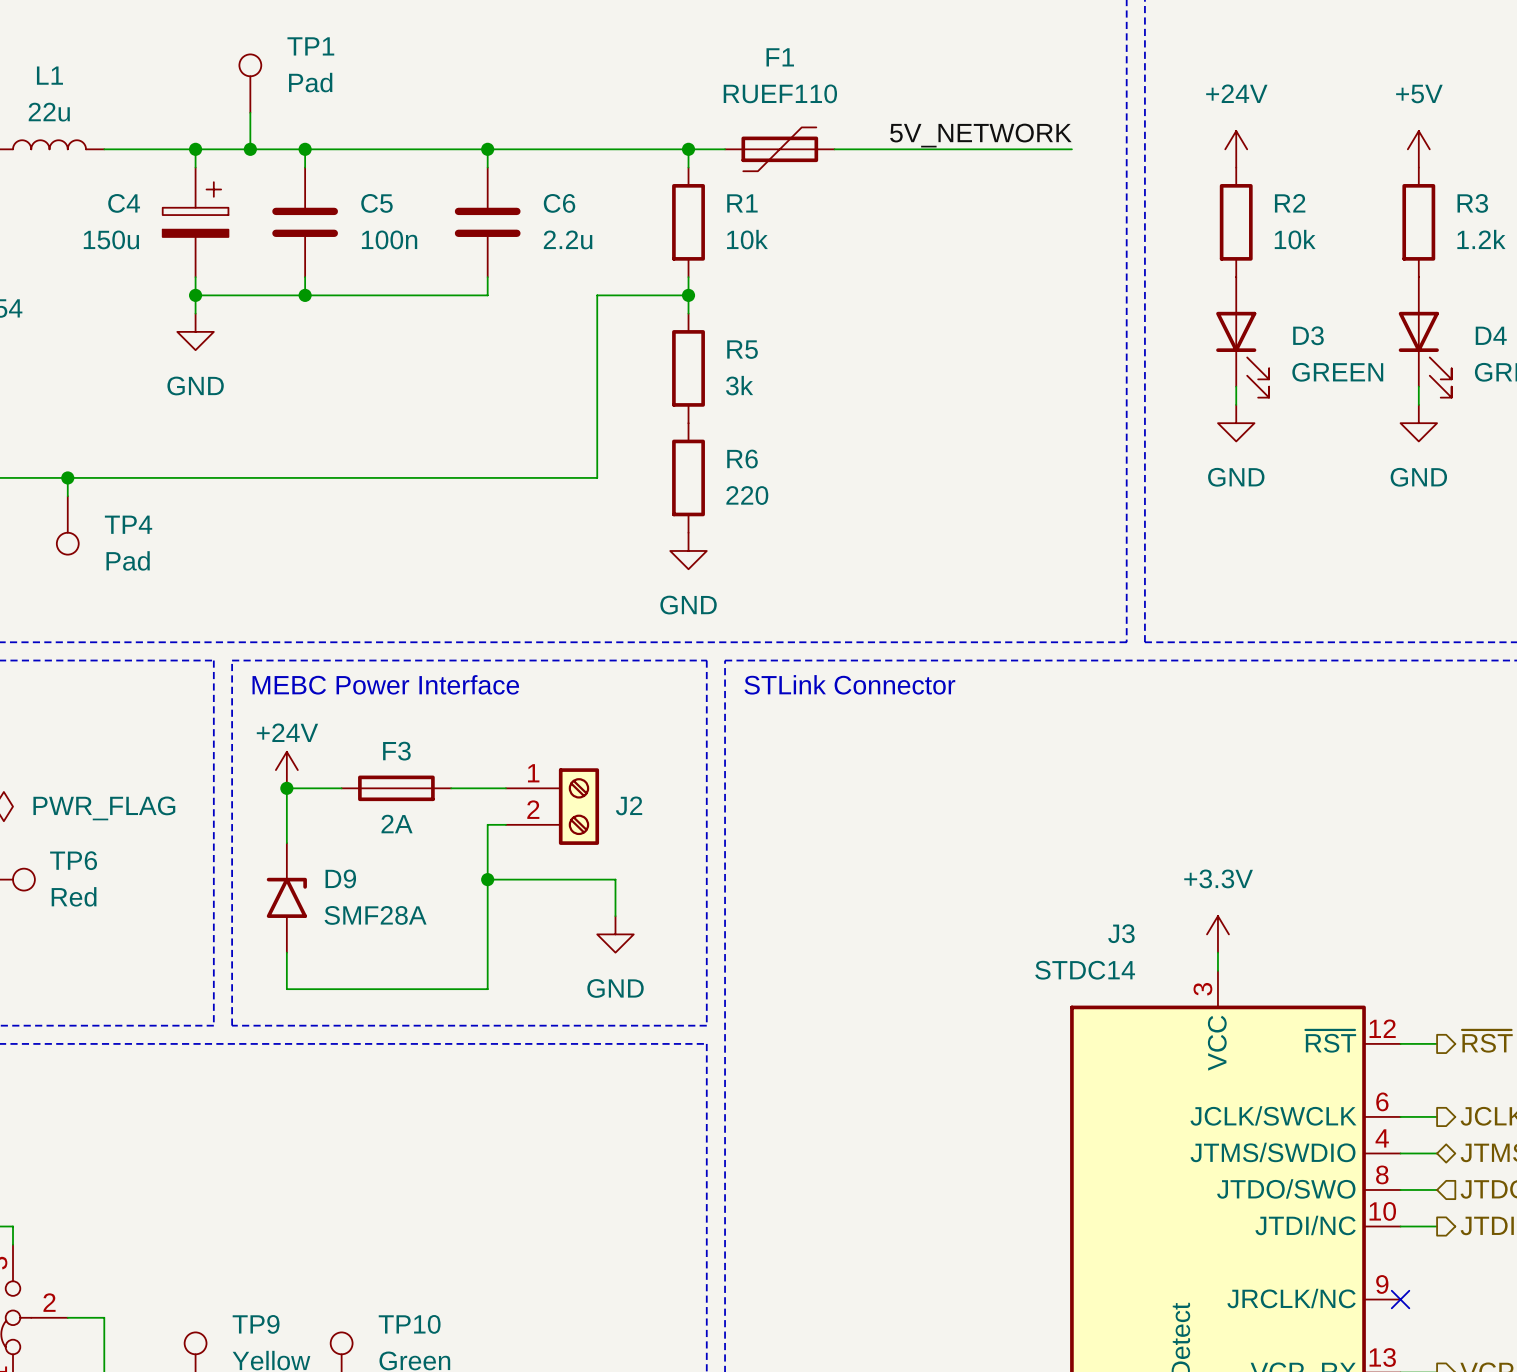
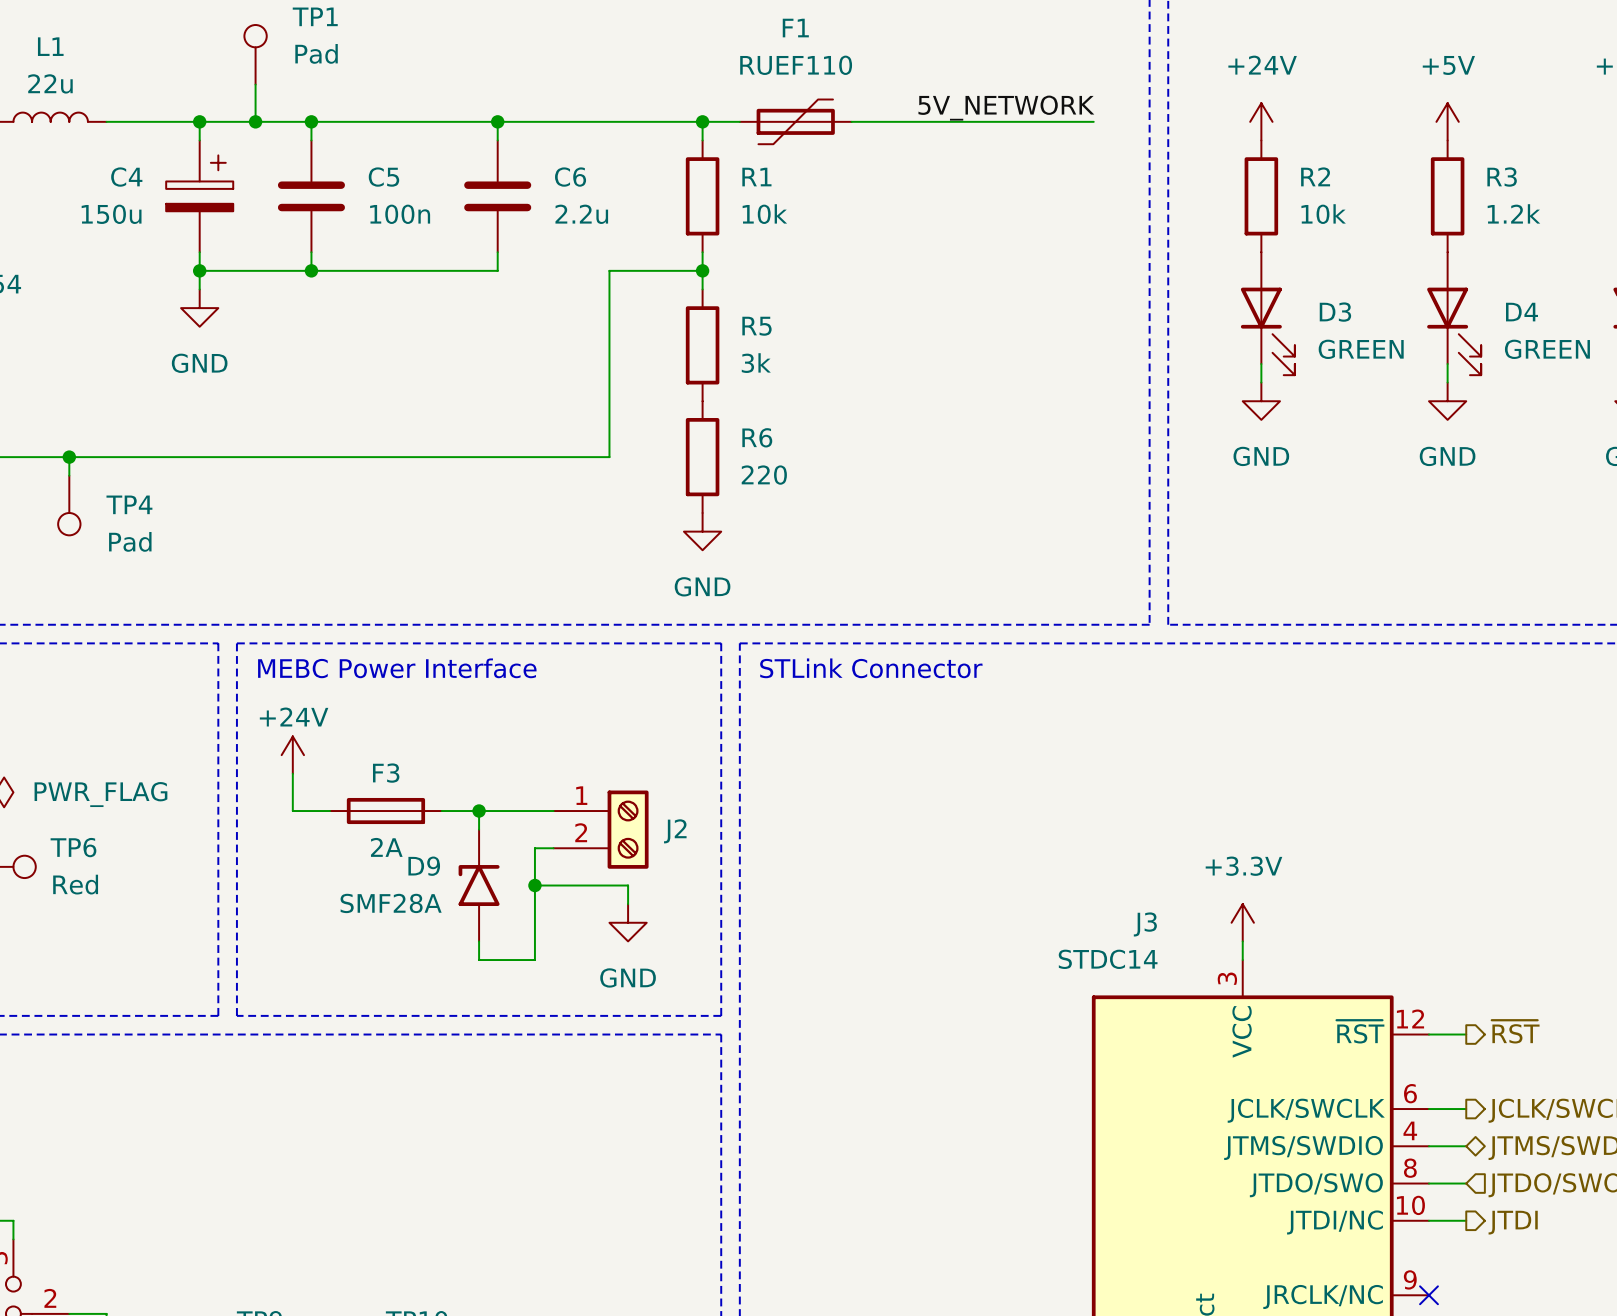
wire: (286, 788) (341, 788) -> none
junction: (286, 788) -> none
F3 position: (396, 788) -> (385, 811)
wire: (451, 788) (505, 788) -> none
J2 position: (552, 806) -> (601, 829)
wire: (286, 824) (286, 843) -> (292, 811) (330, 811)
wire: none -> (479, 811) (479, 829)
junction: none -> (479, 811)
wire: (487, 824) (487, 989) (286, 989) (286, 952) -> (497, 811) (441, 811)
wire: none -> (553, 848) (534, 848) (534, 960) (479, 960) (479, 941)
wire: (487, 879) (615, 879) (615, 897) -> (534, 885) (628, 885)
junction: (487, 879) -> none
D9 flip: as is (286, 897) -> left-right (479, 885)
D9 position: (286, 897) -> (479, 885)
junction: none -> (534, 885)

